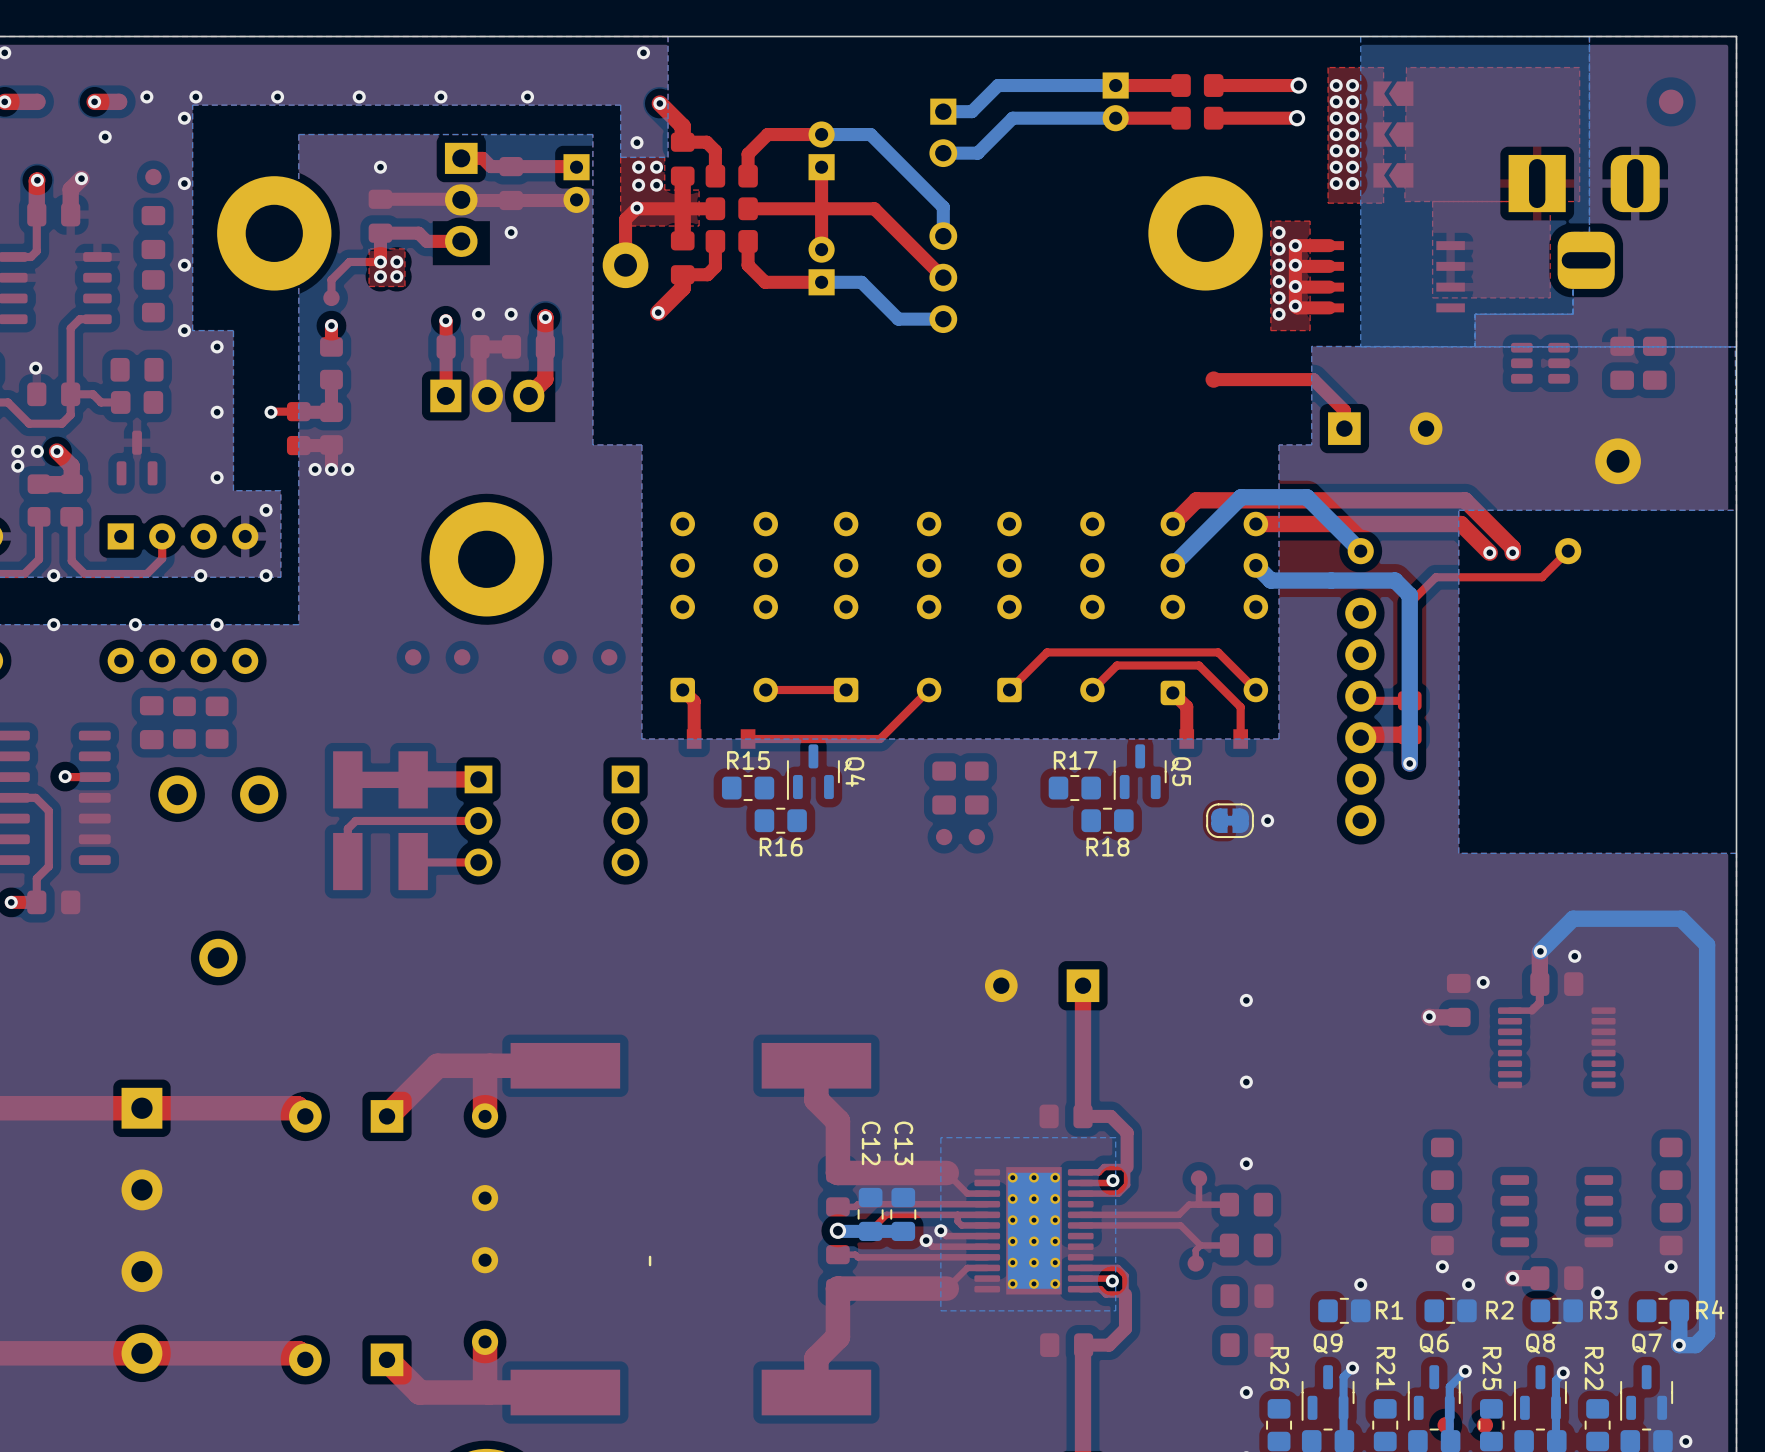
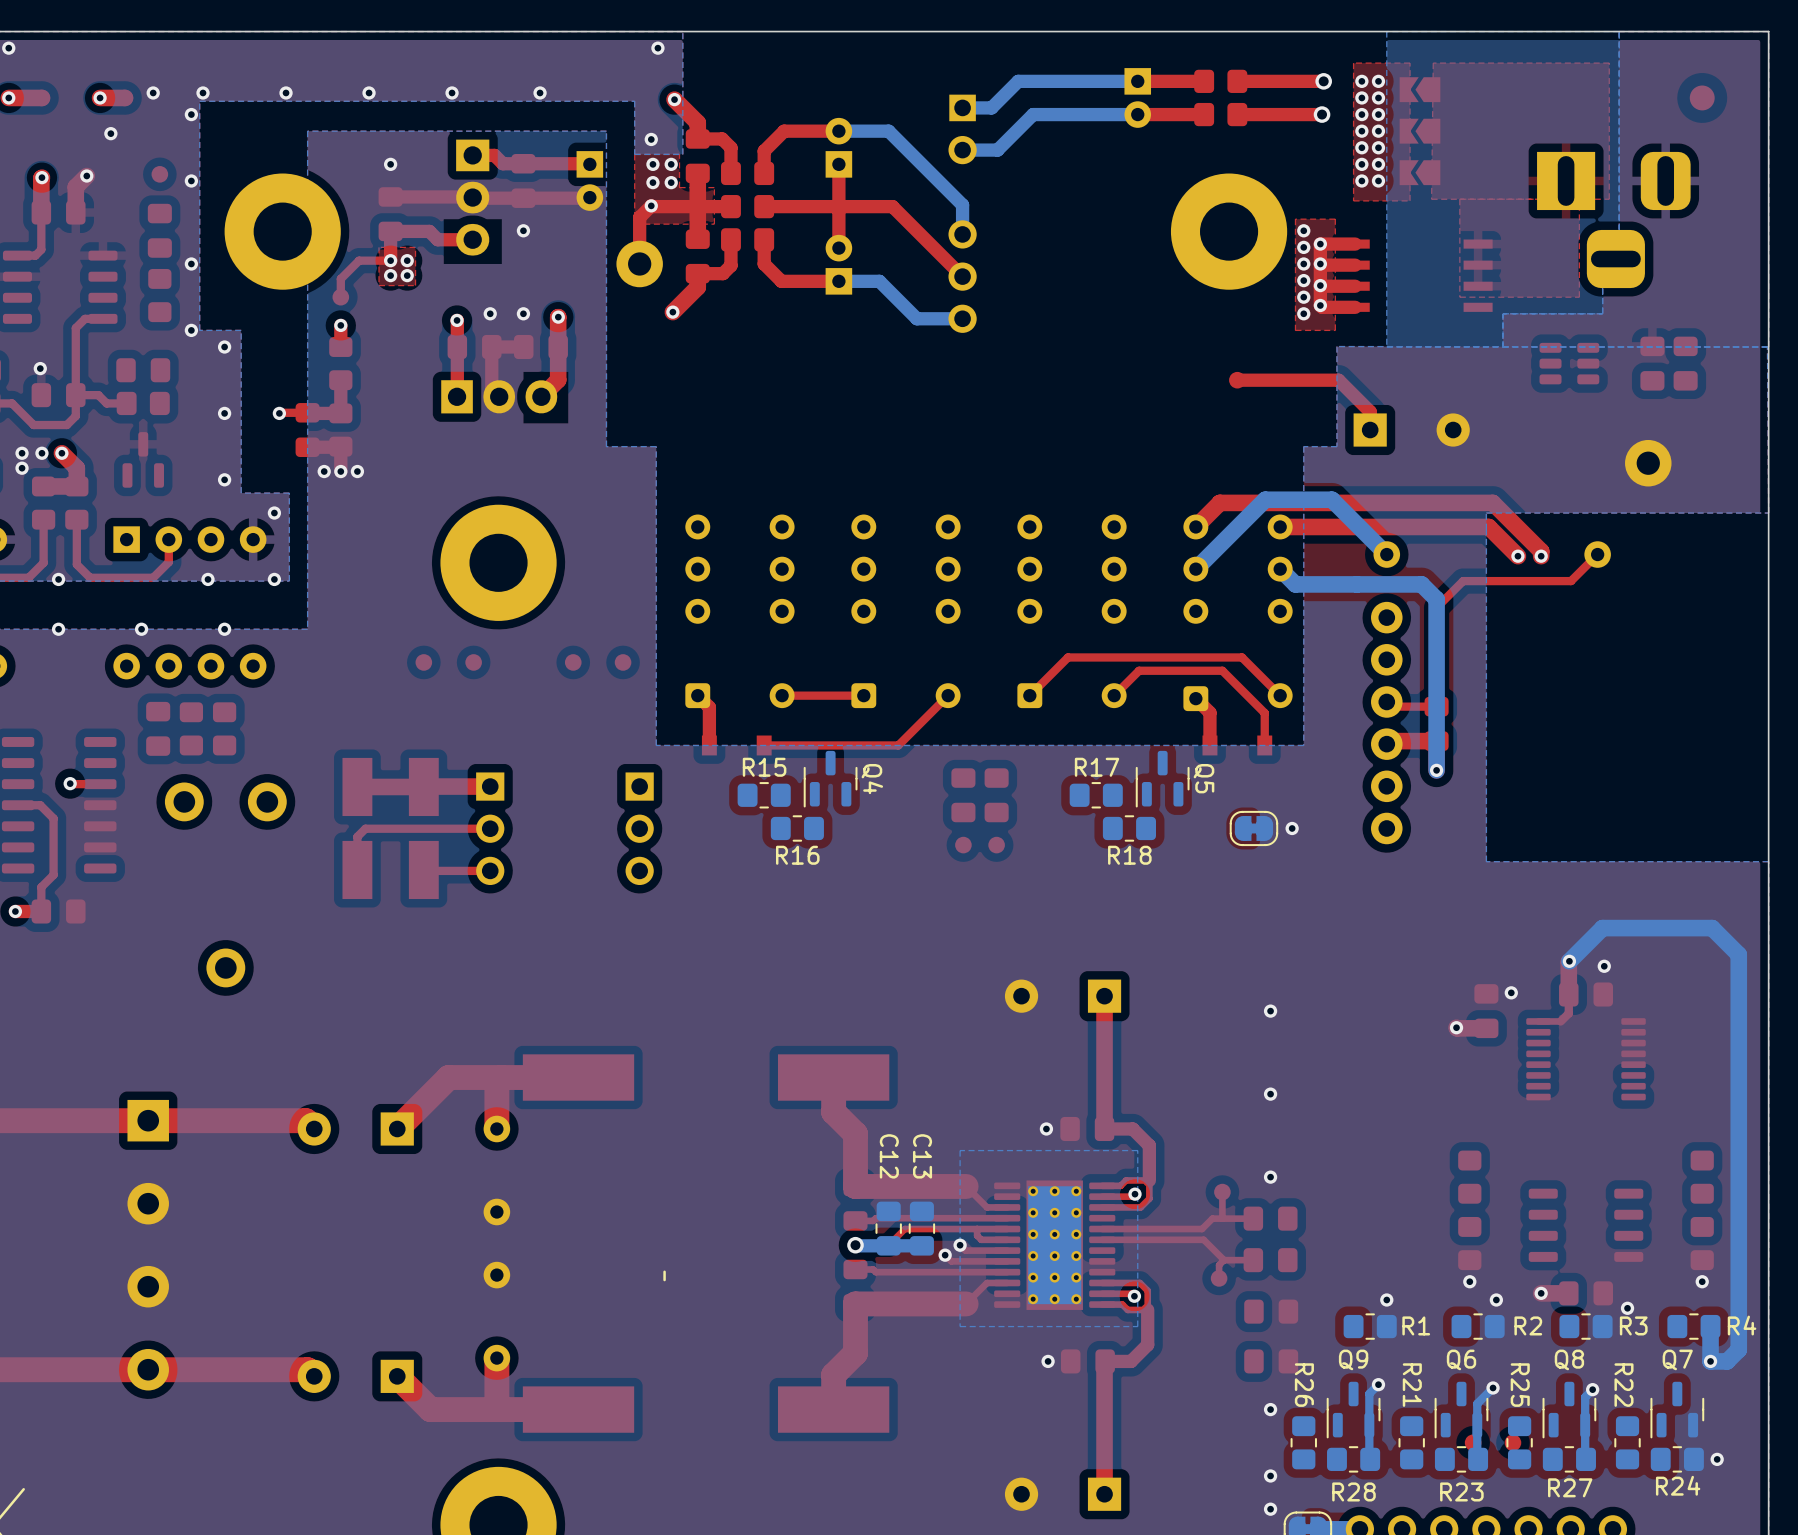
via: none -> (1046, 1128)
via: none -> (1048, 1361)

